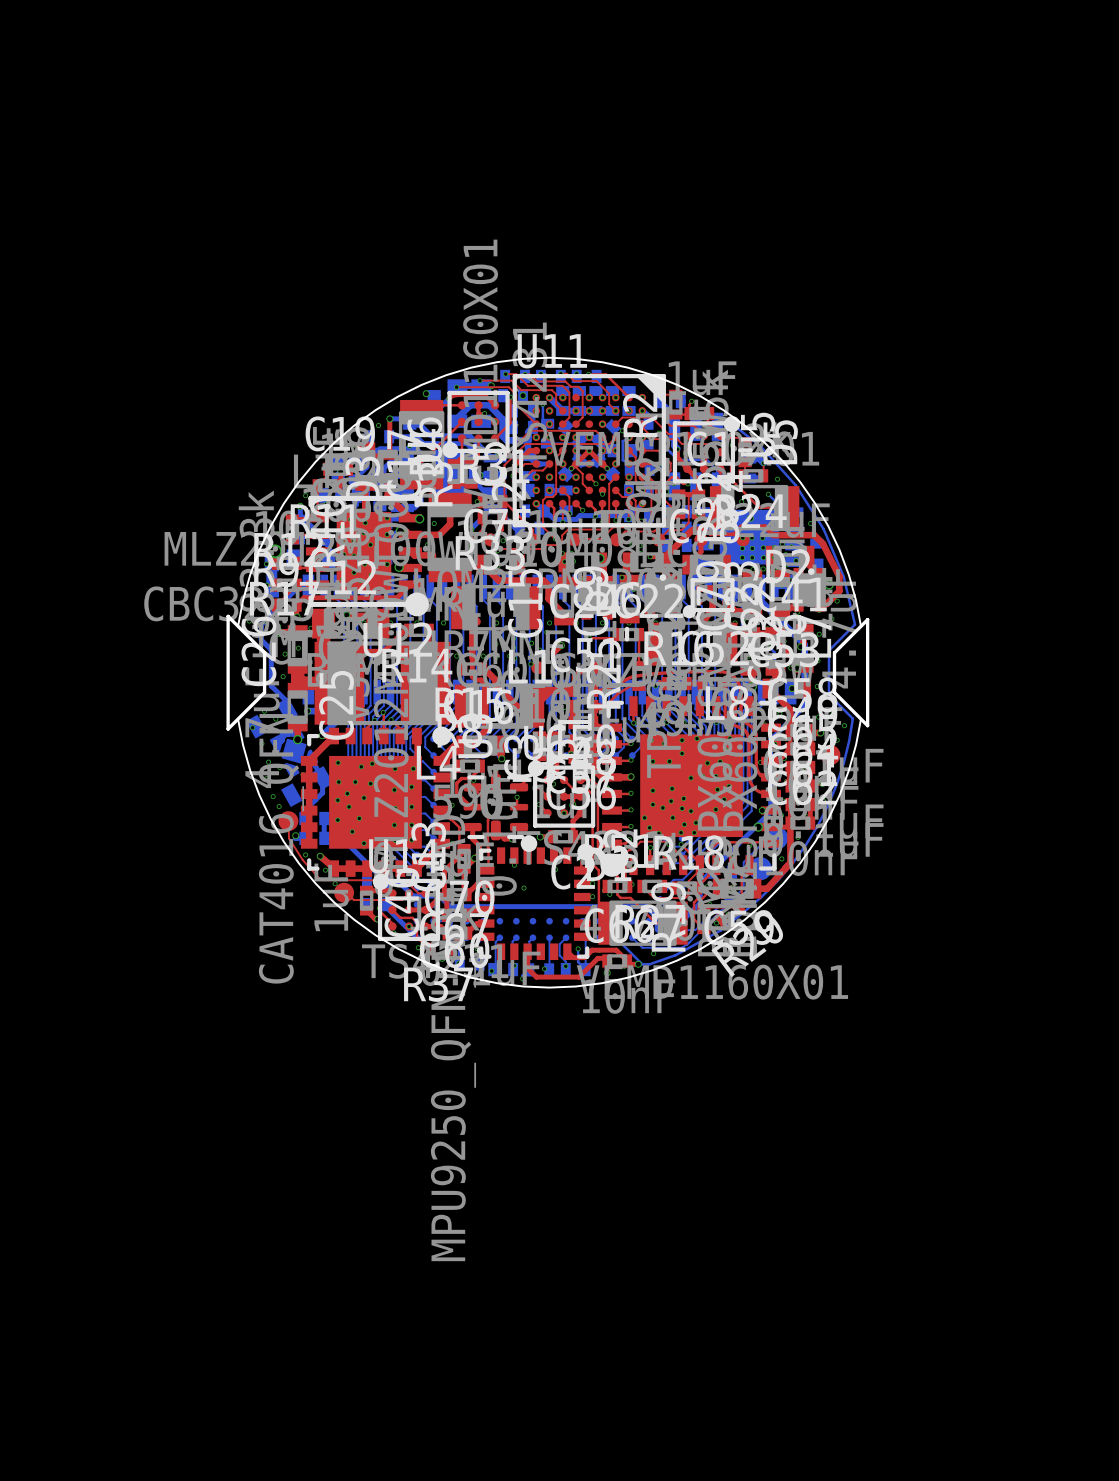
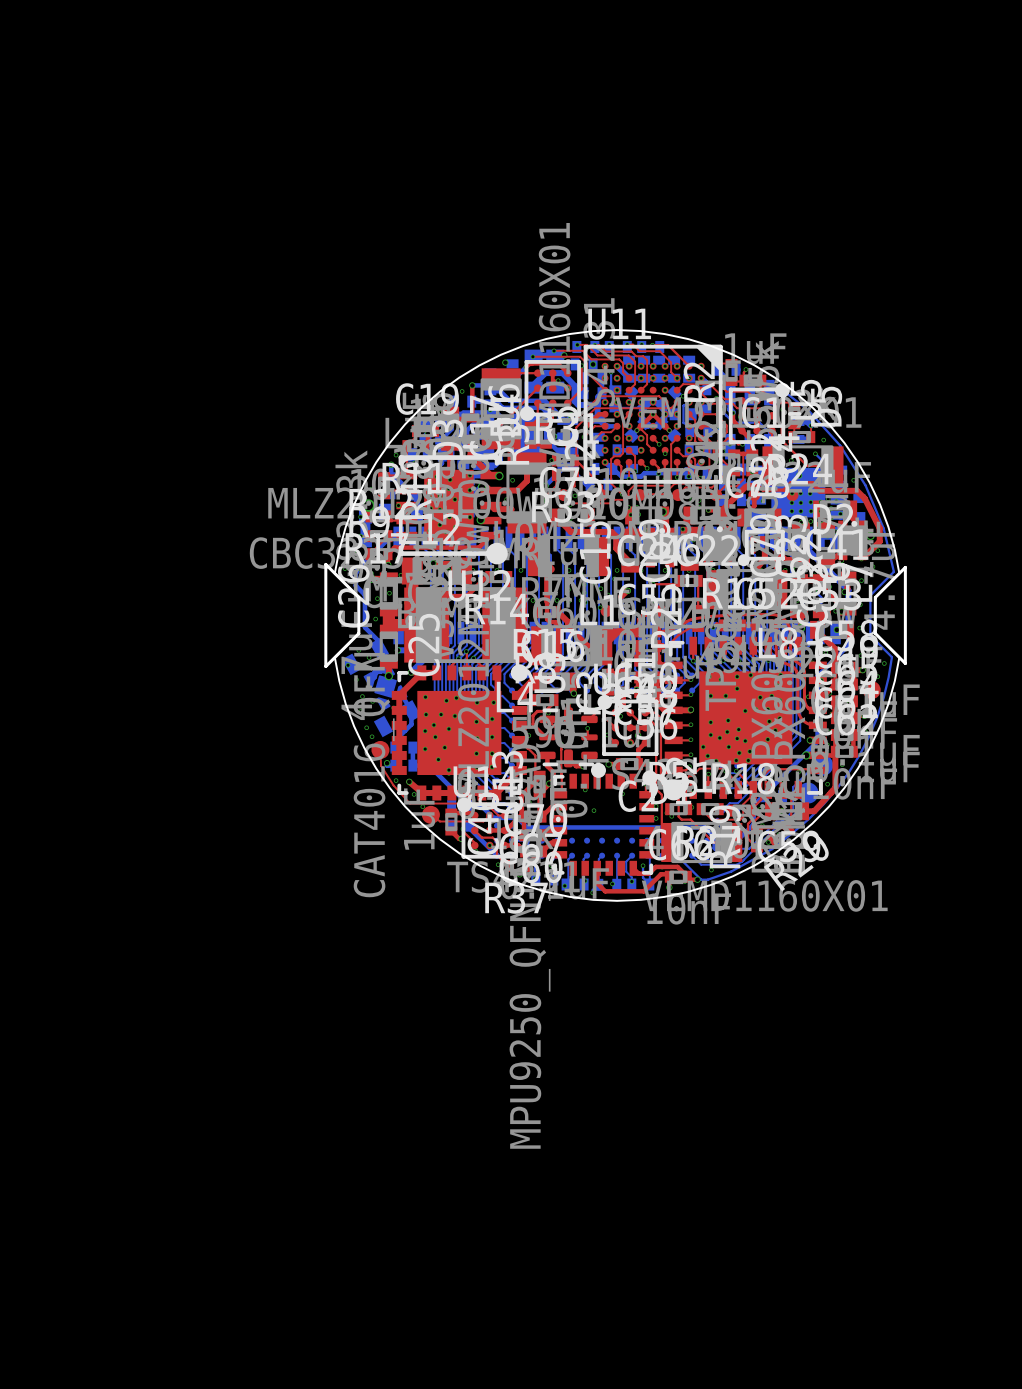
via: none -> (641, 366)
via: none -> (398, 505)

